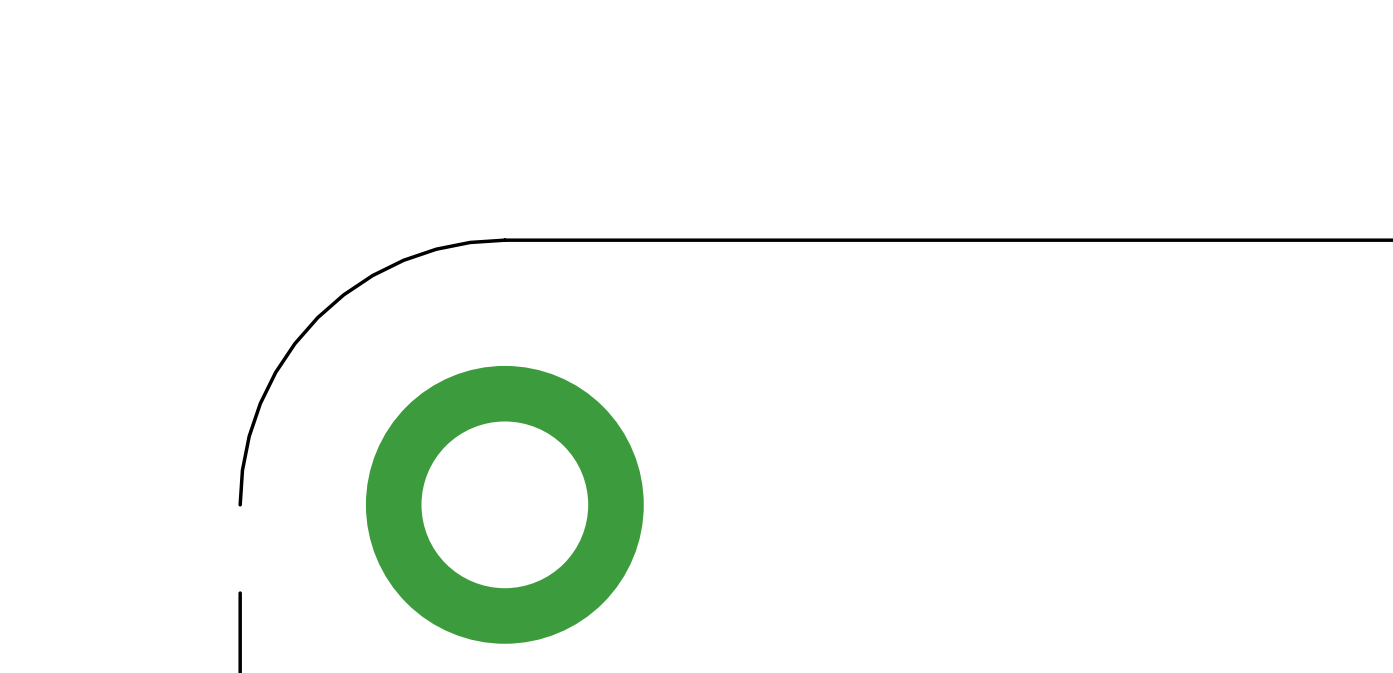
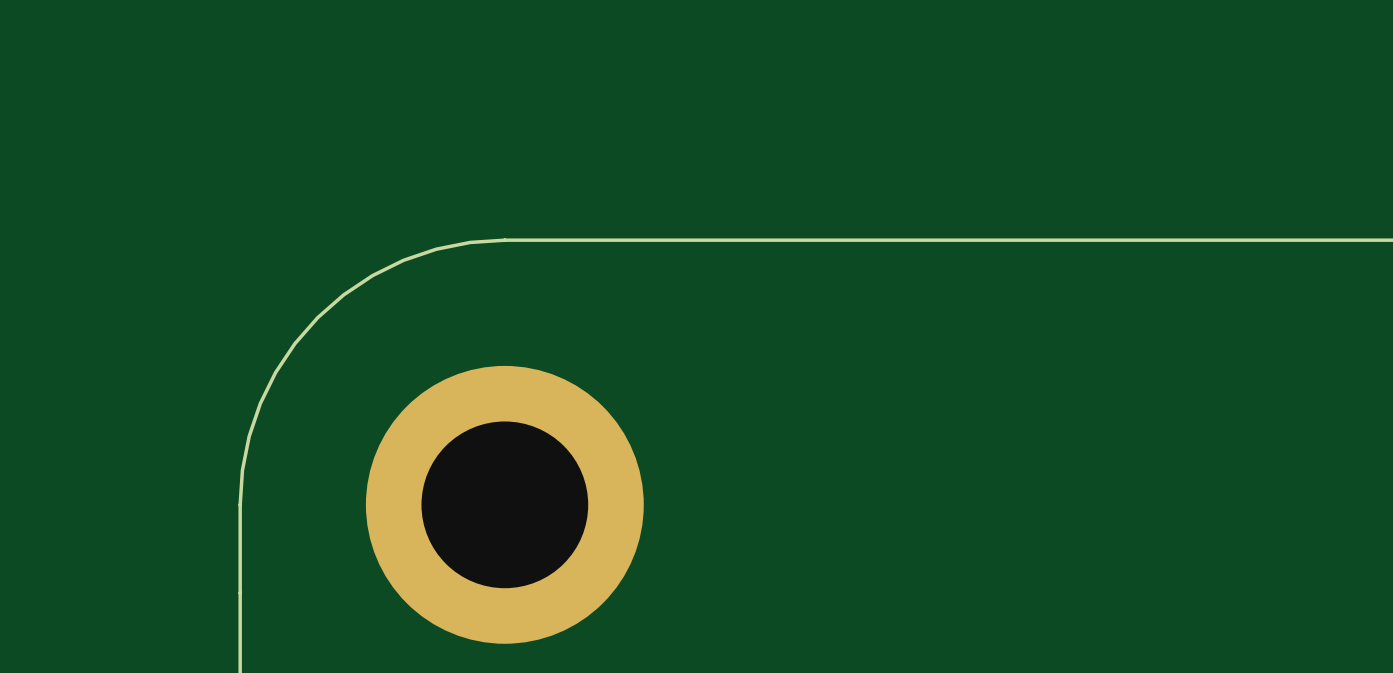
board edge: none -> (240, 504) (240, 593)

